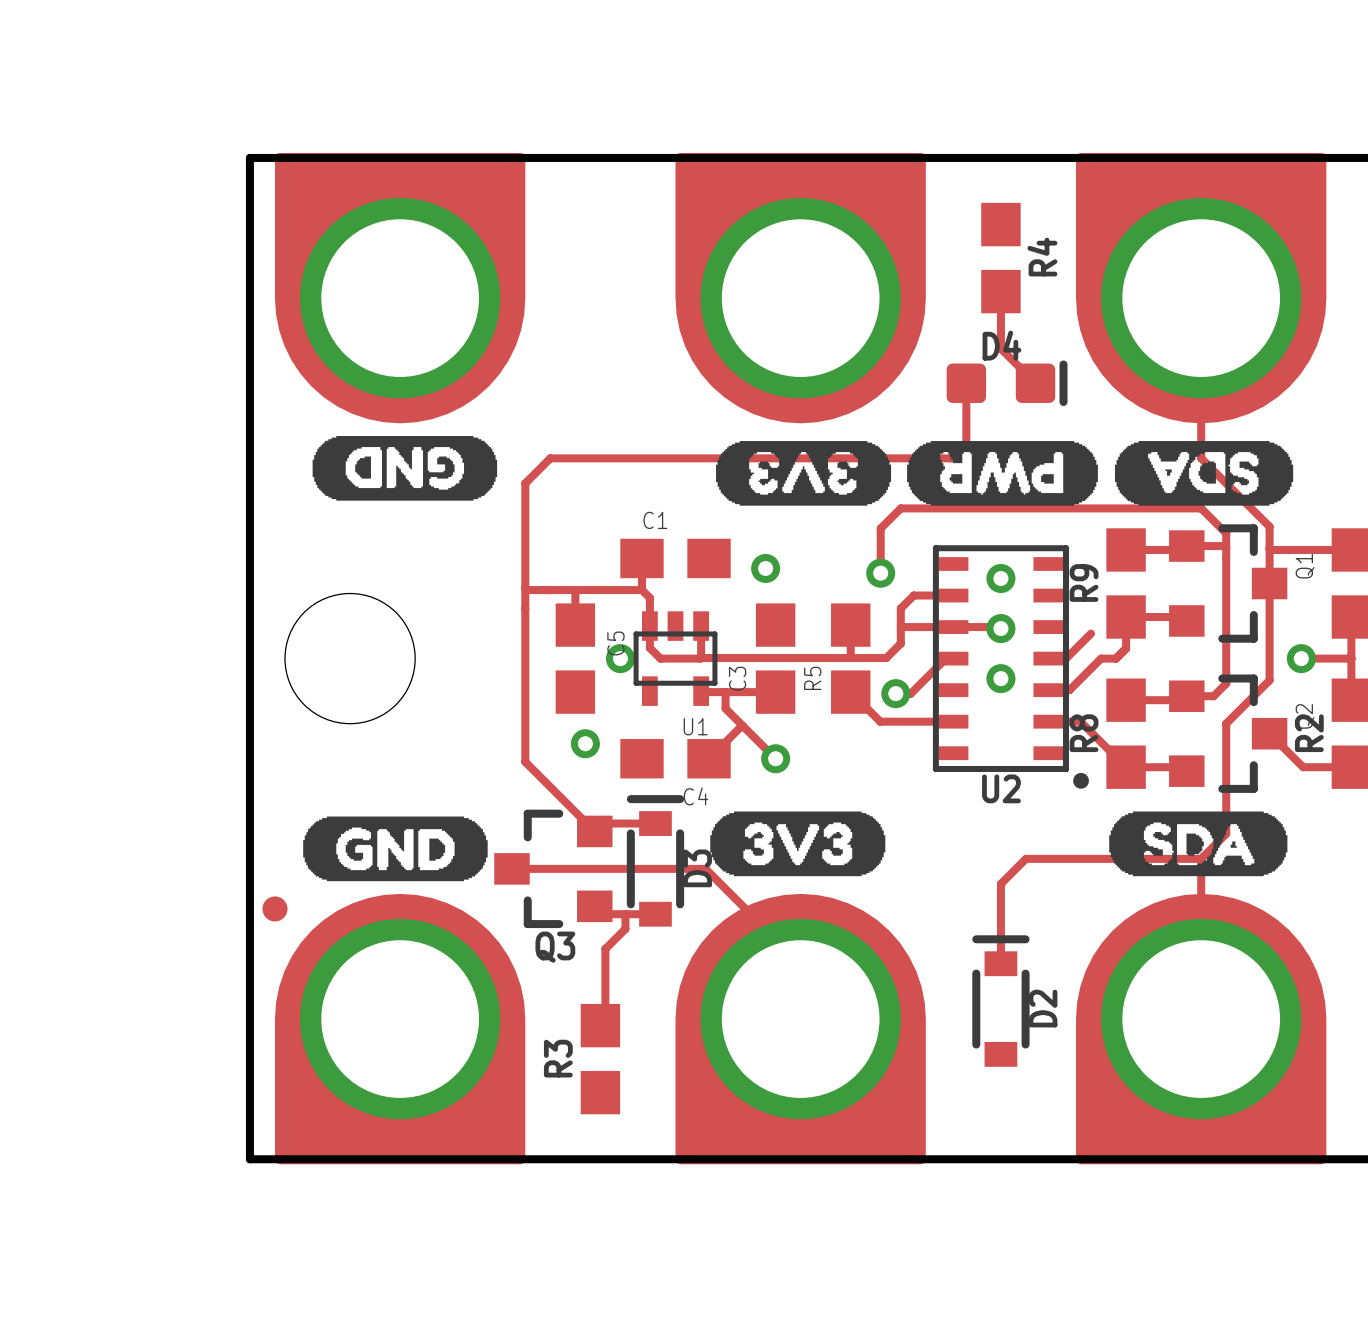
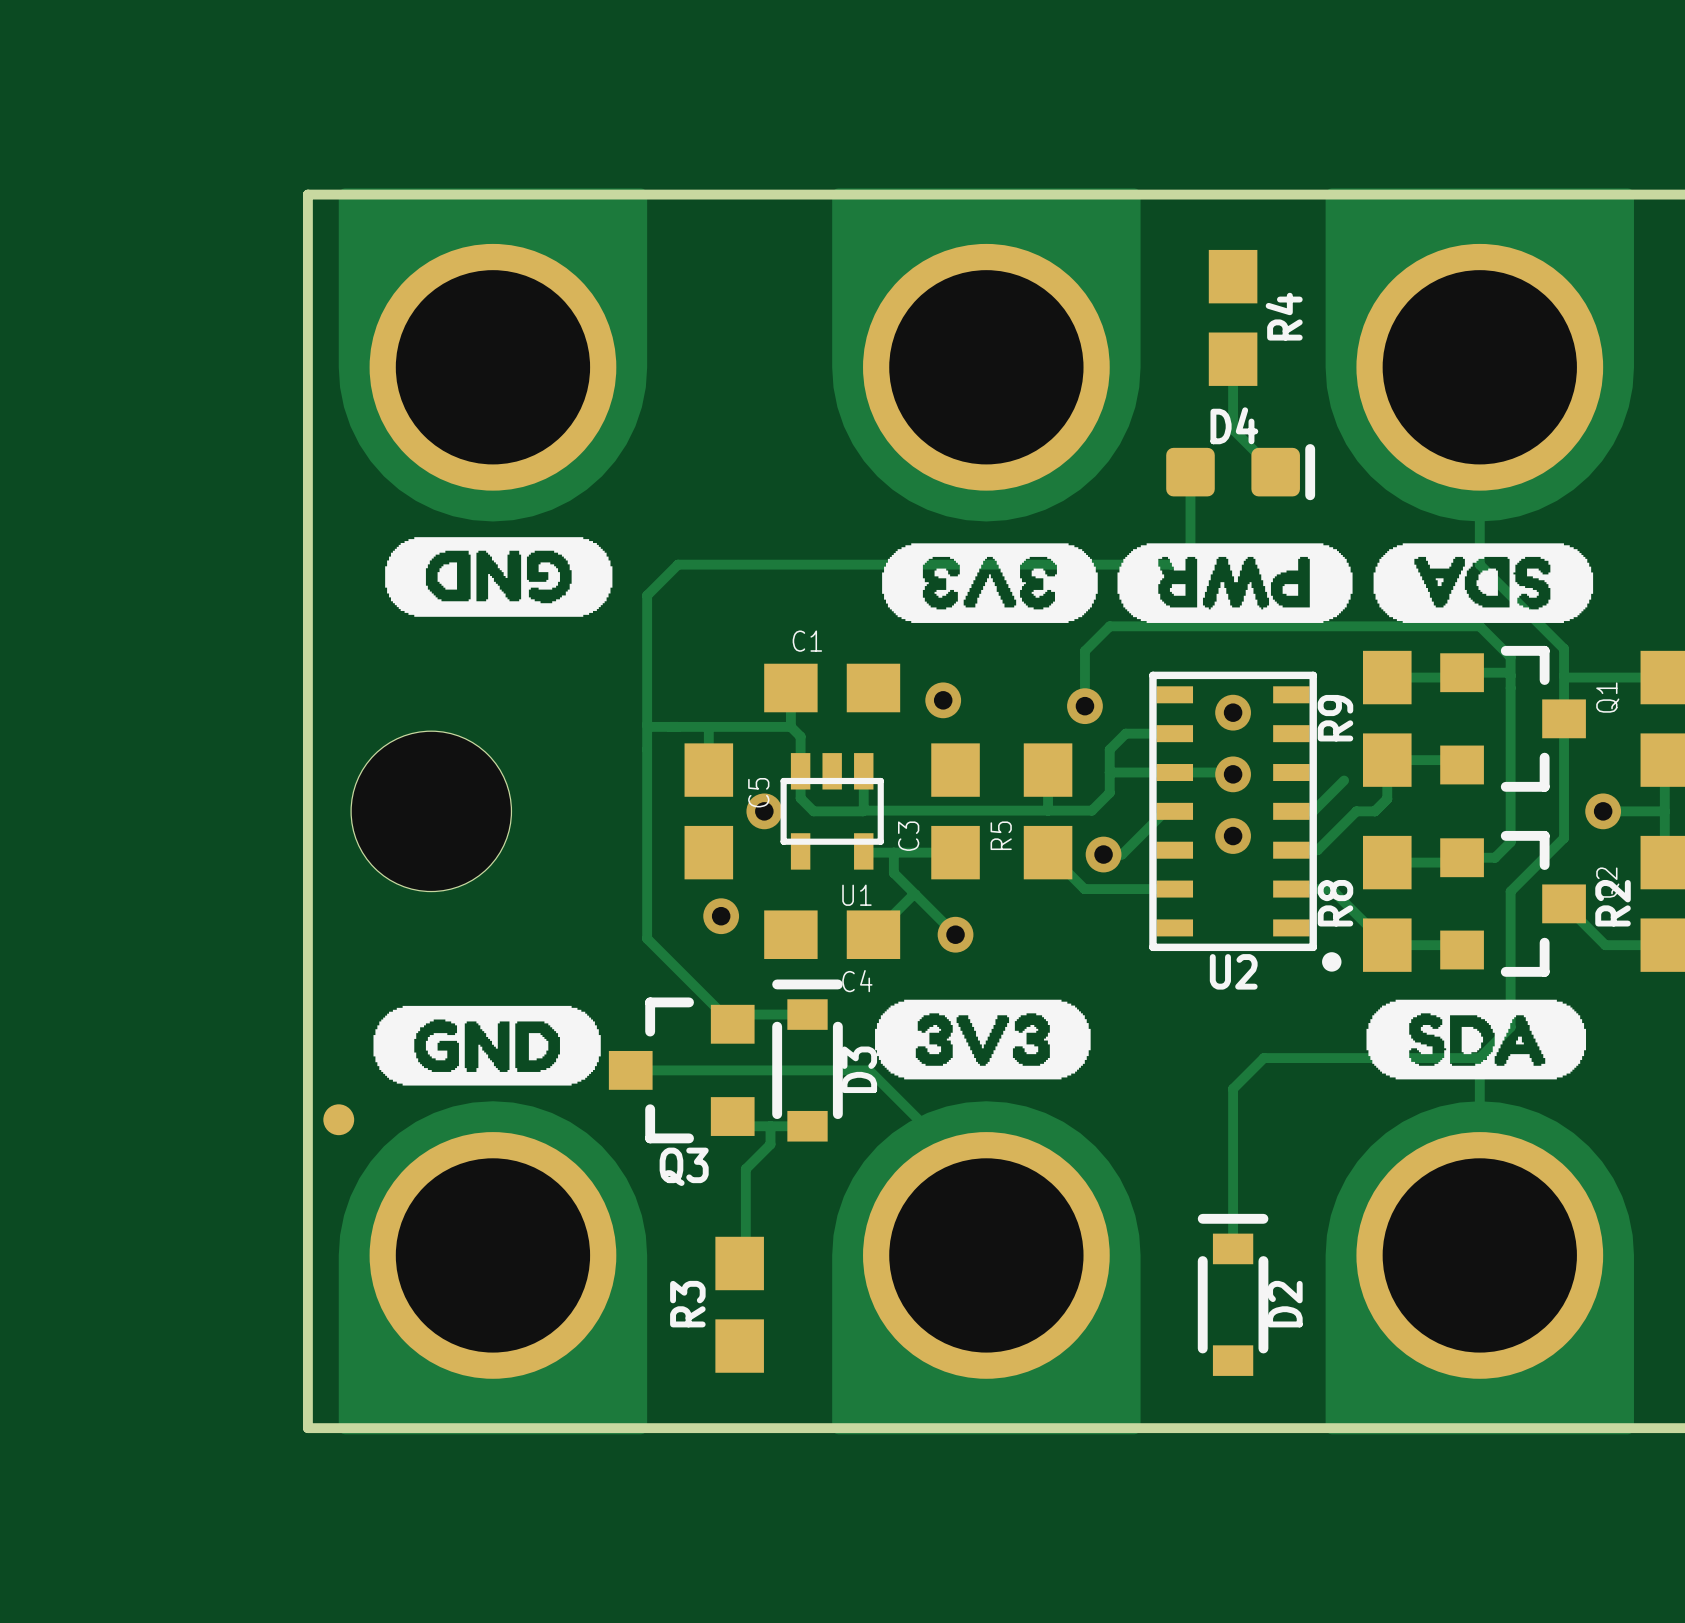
track: none -> (1233, 1187) (1233, 1248)
D2 position: (1000, 1001) -> (1233, 1294)

